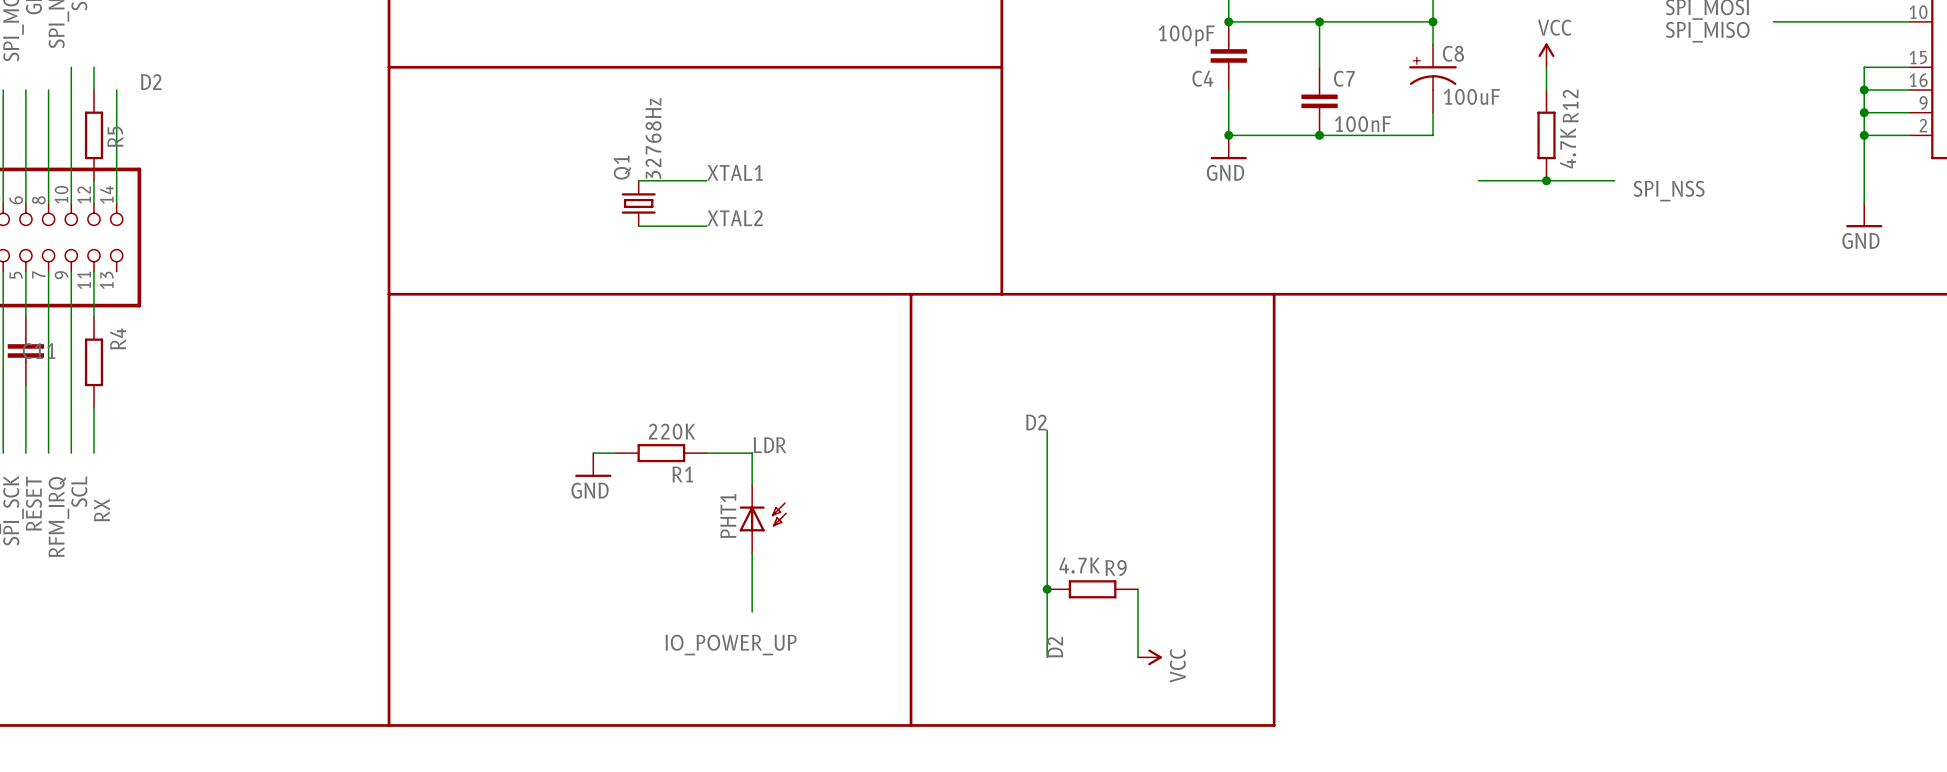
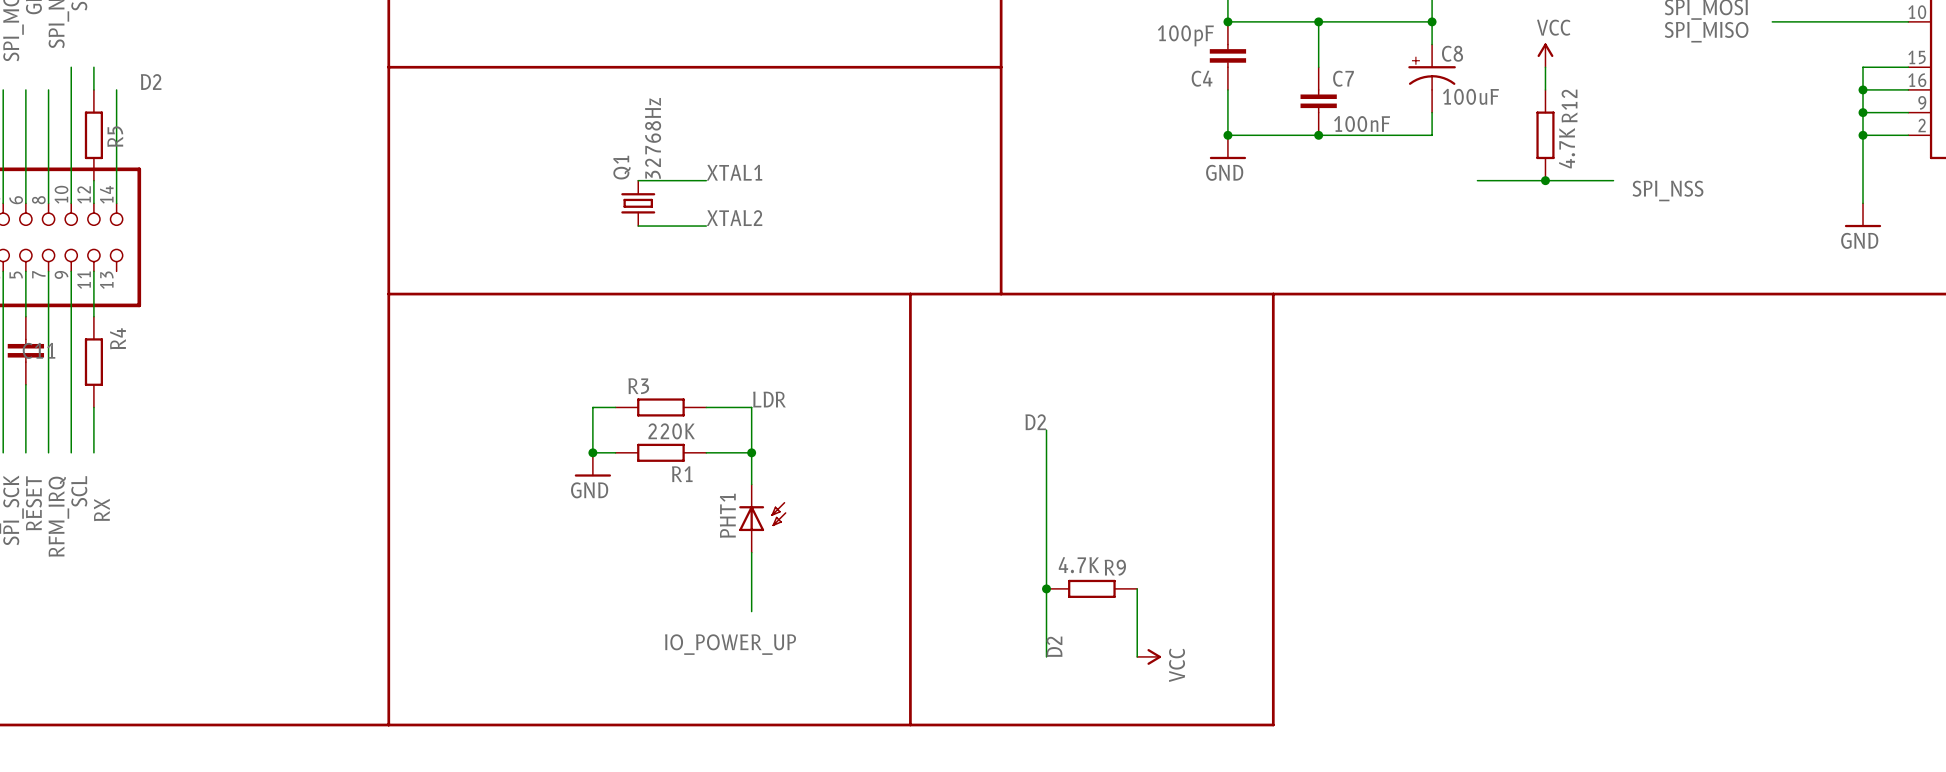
wire: none -> (615, 407) (592, 407) (592, 452)
R3: none -> (660, 407)
wire: none -> (706, 407) (751, 407) (751, 452)
label position: LDR (769, 445) -> LDR (769, 399)
junction: none -> (592, 452)
junction: none -> (751, 452)

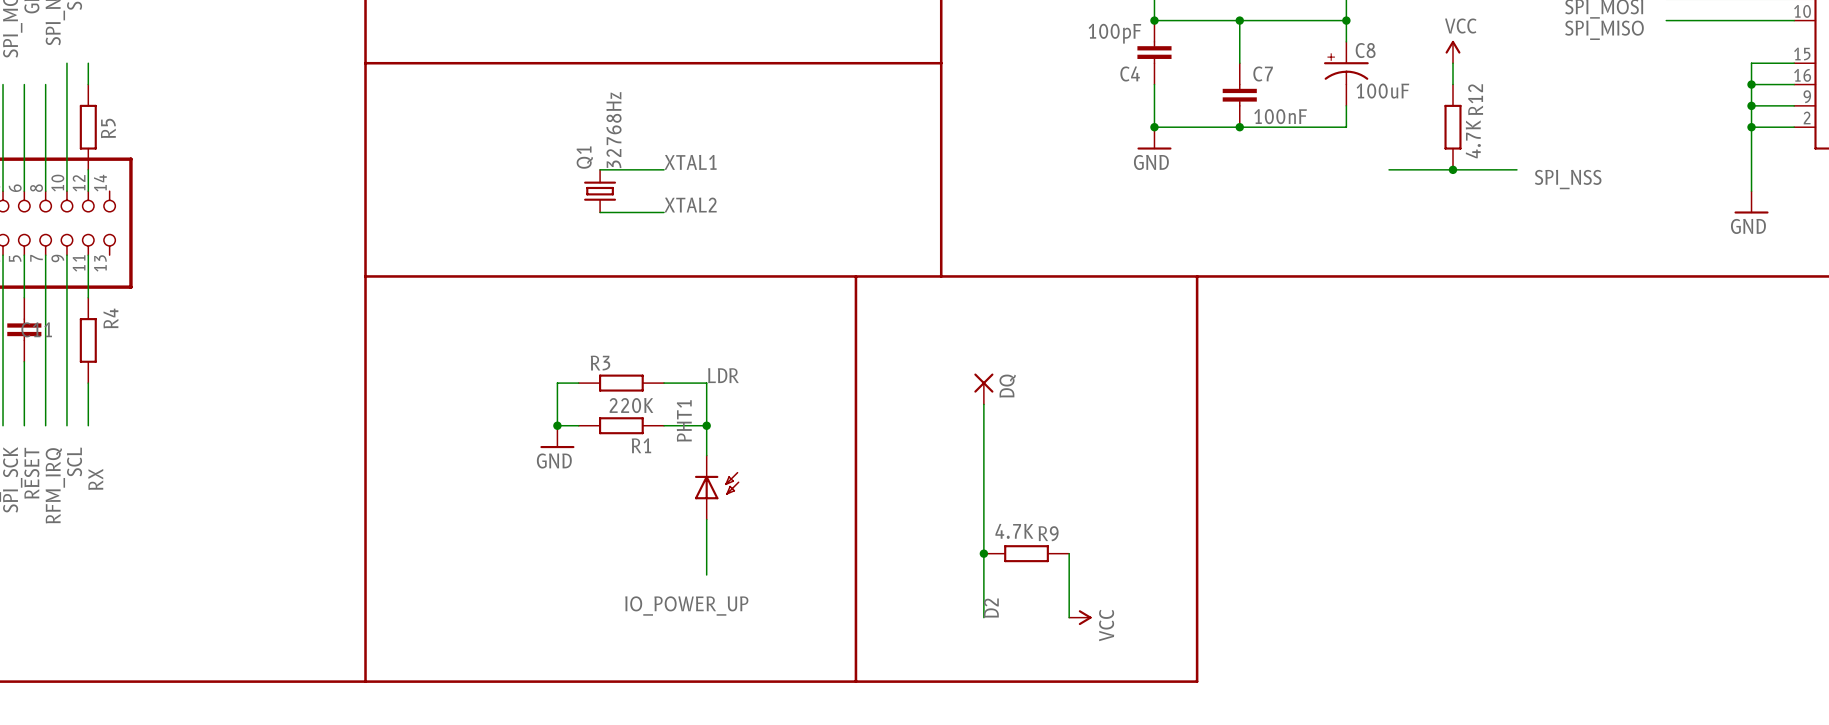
label: D2 (151, 82) -> none
wire: (116, 89) (116, 203) -> none
DQ: none -> (983, 388)
label: D2 (1035, 422) -> none
PHT1 name position: PHT1 (727, 515) -> PHT1 (684, 420)

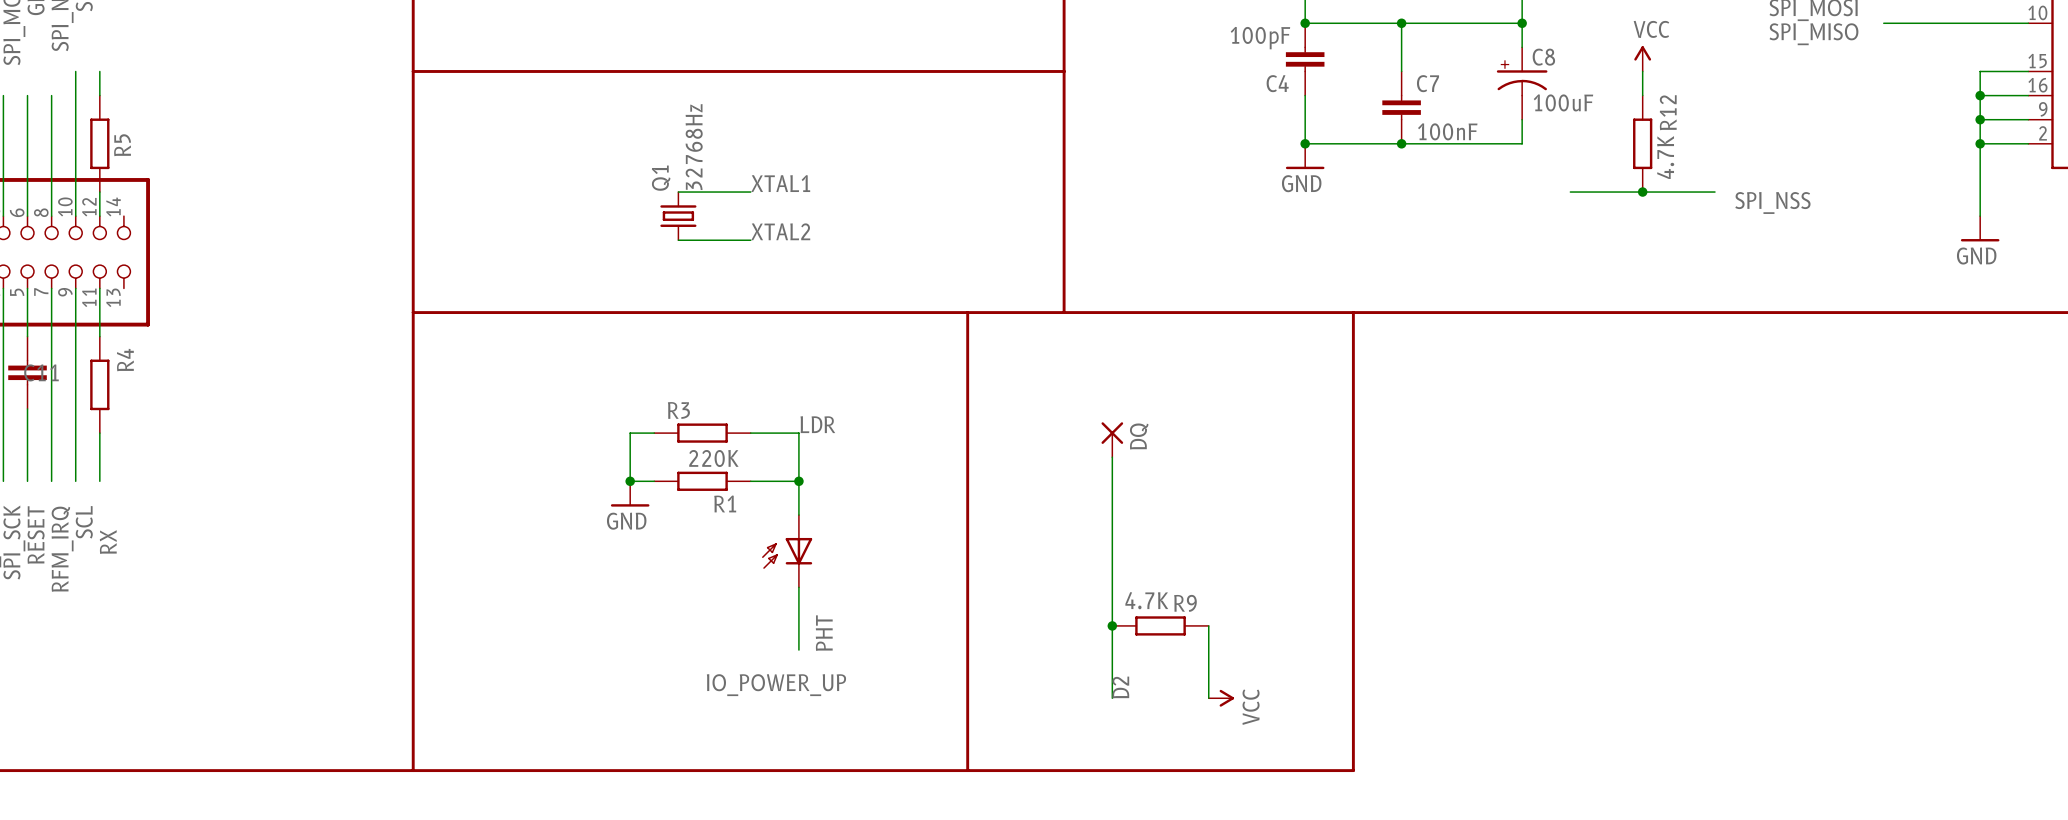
PHT: none -> (787, 550)
PHT1: (717, 487) -> none

